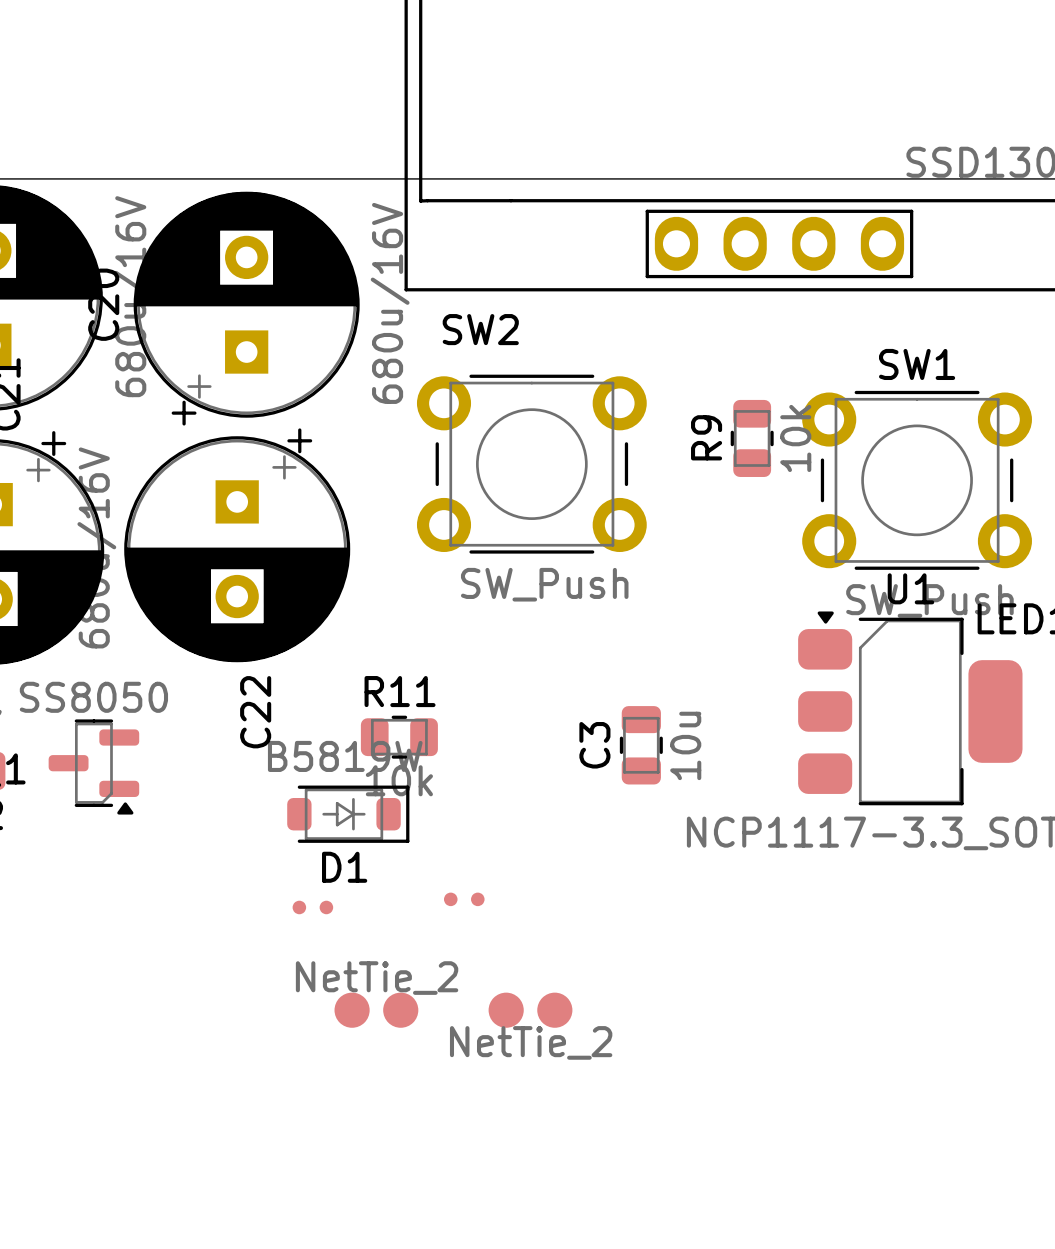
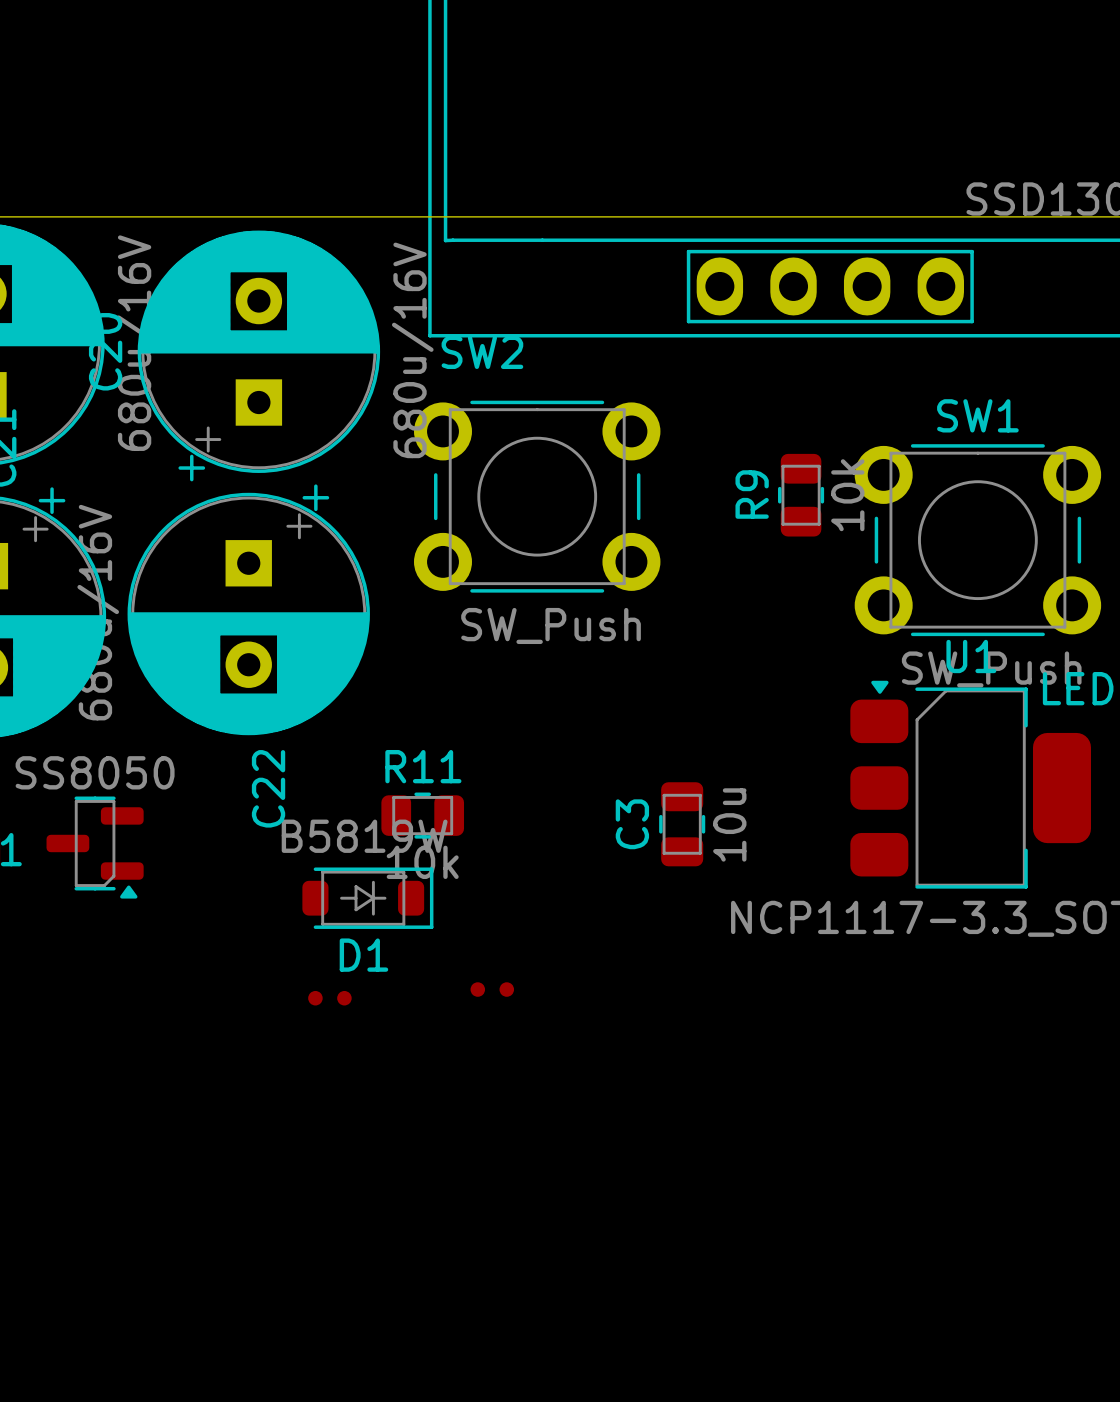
SW2 position: (531, 464) -> (537, 496)
part: NetTie_2 (376, 1010) -> none
part: NetTie_2 (530, 1010) -> none

